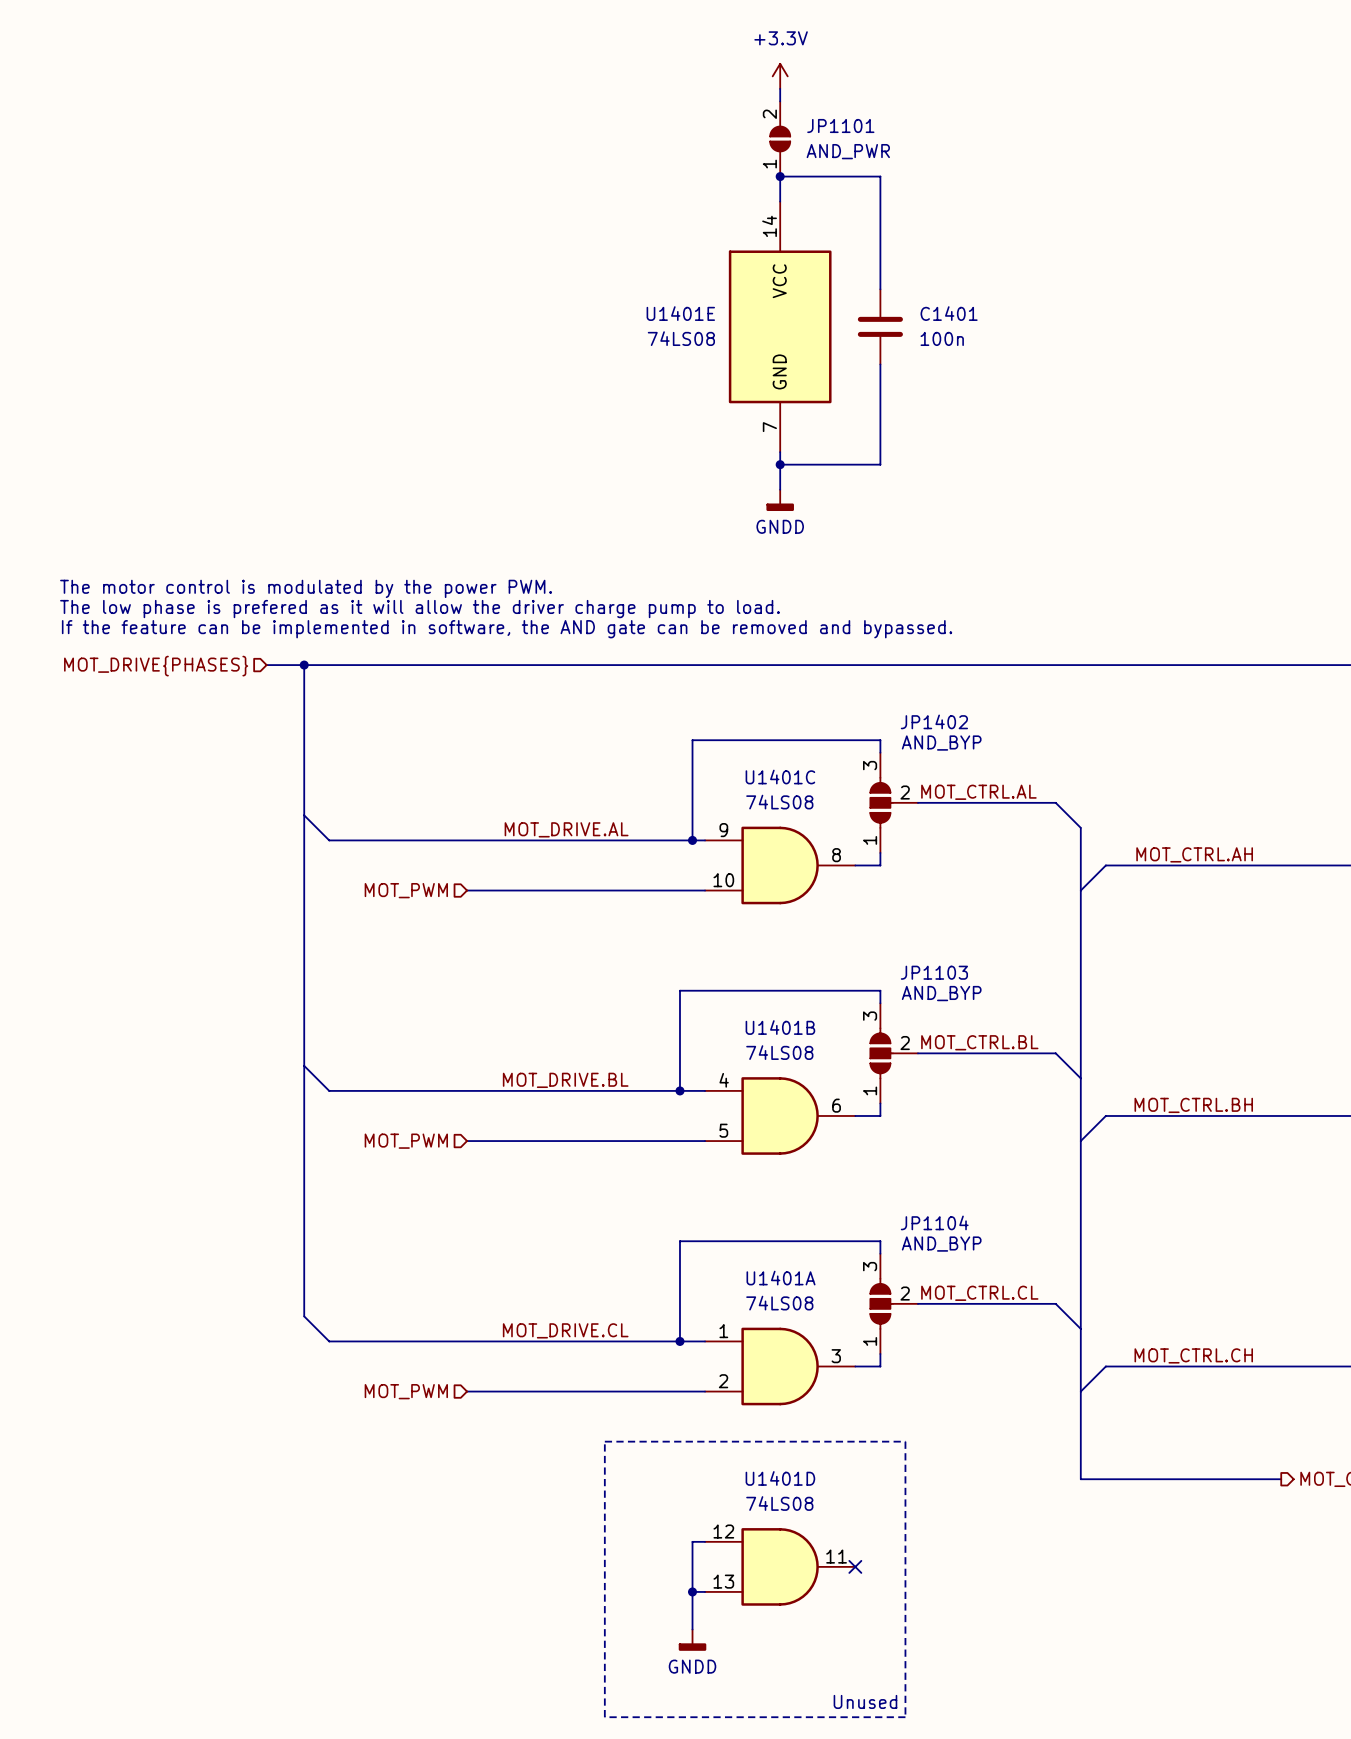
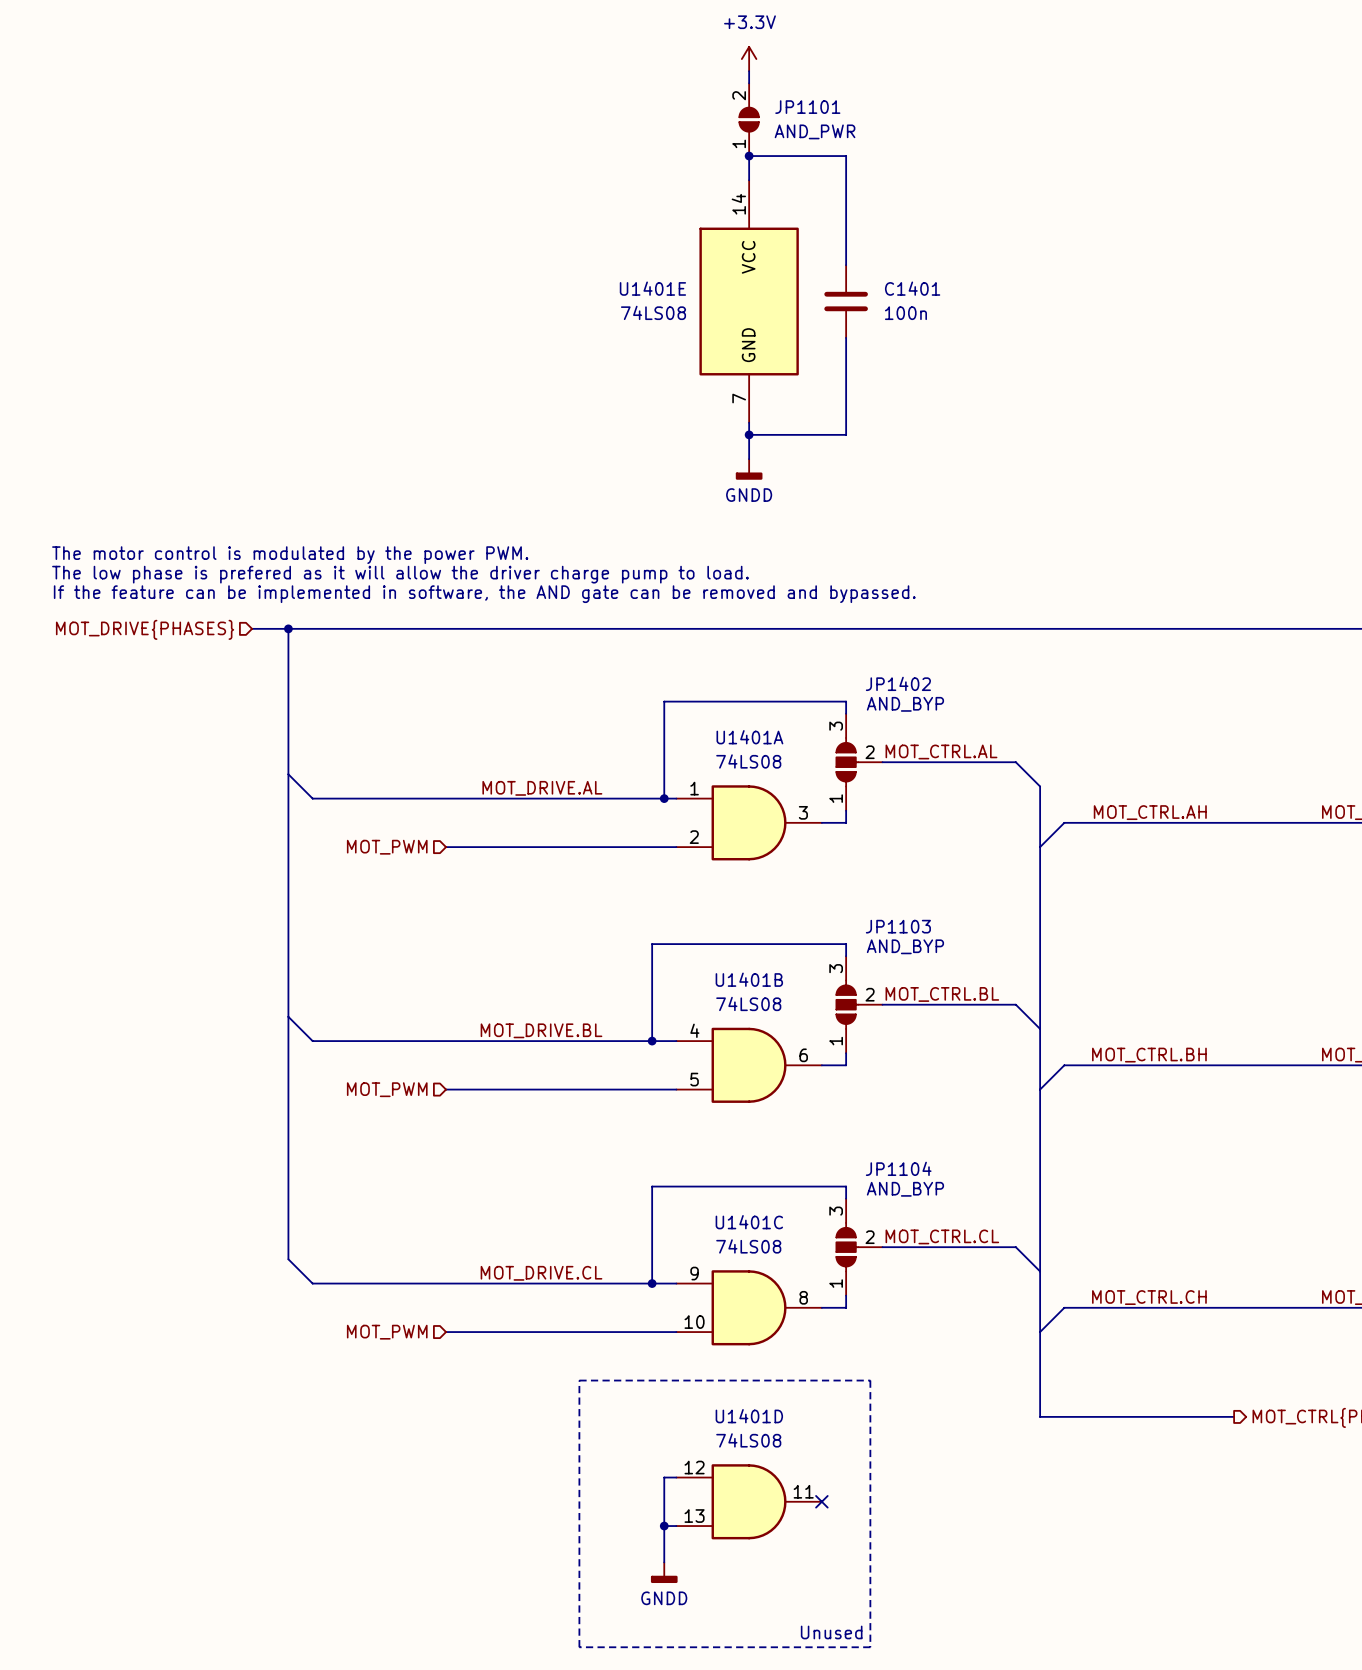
U1401C position: (780, 865) -> (749, 1307)
U1401A position: (780, 1366) -> (749, 822)

